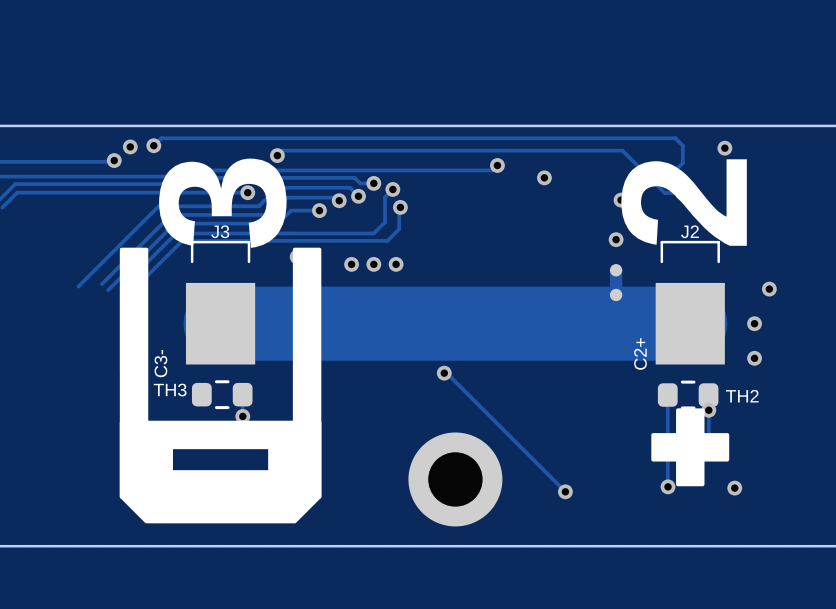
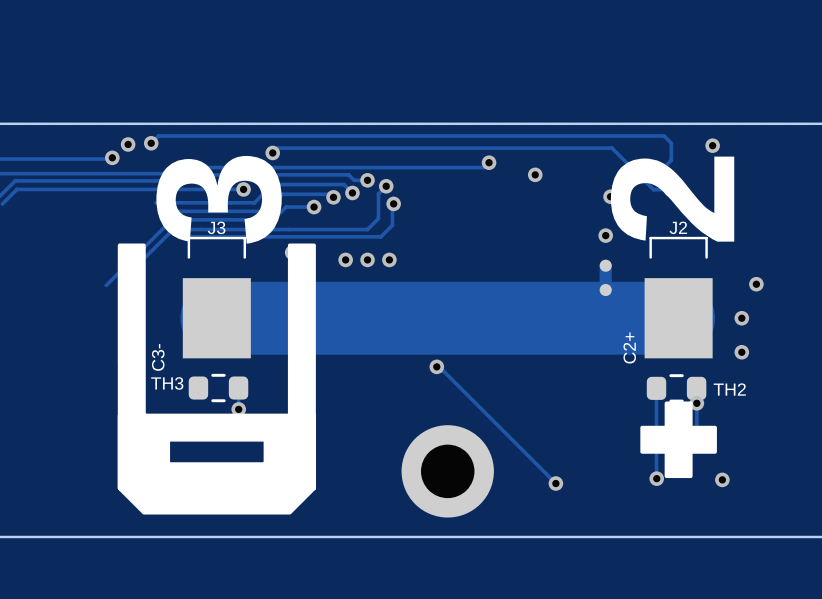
track: (158, 206) (78, 286) -> none
track: (171, 214) (101, 284) -> none
track: (182, 240) (135, 287) -> none

